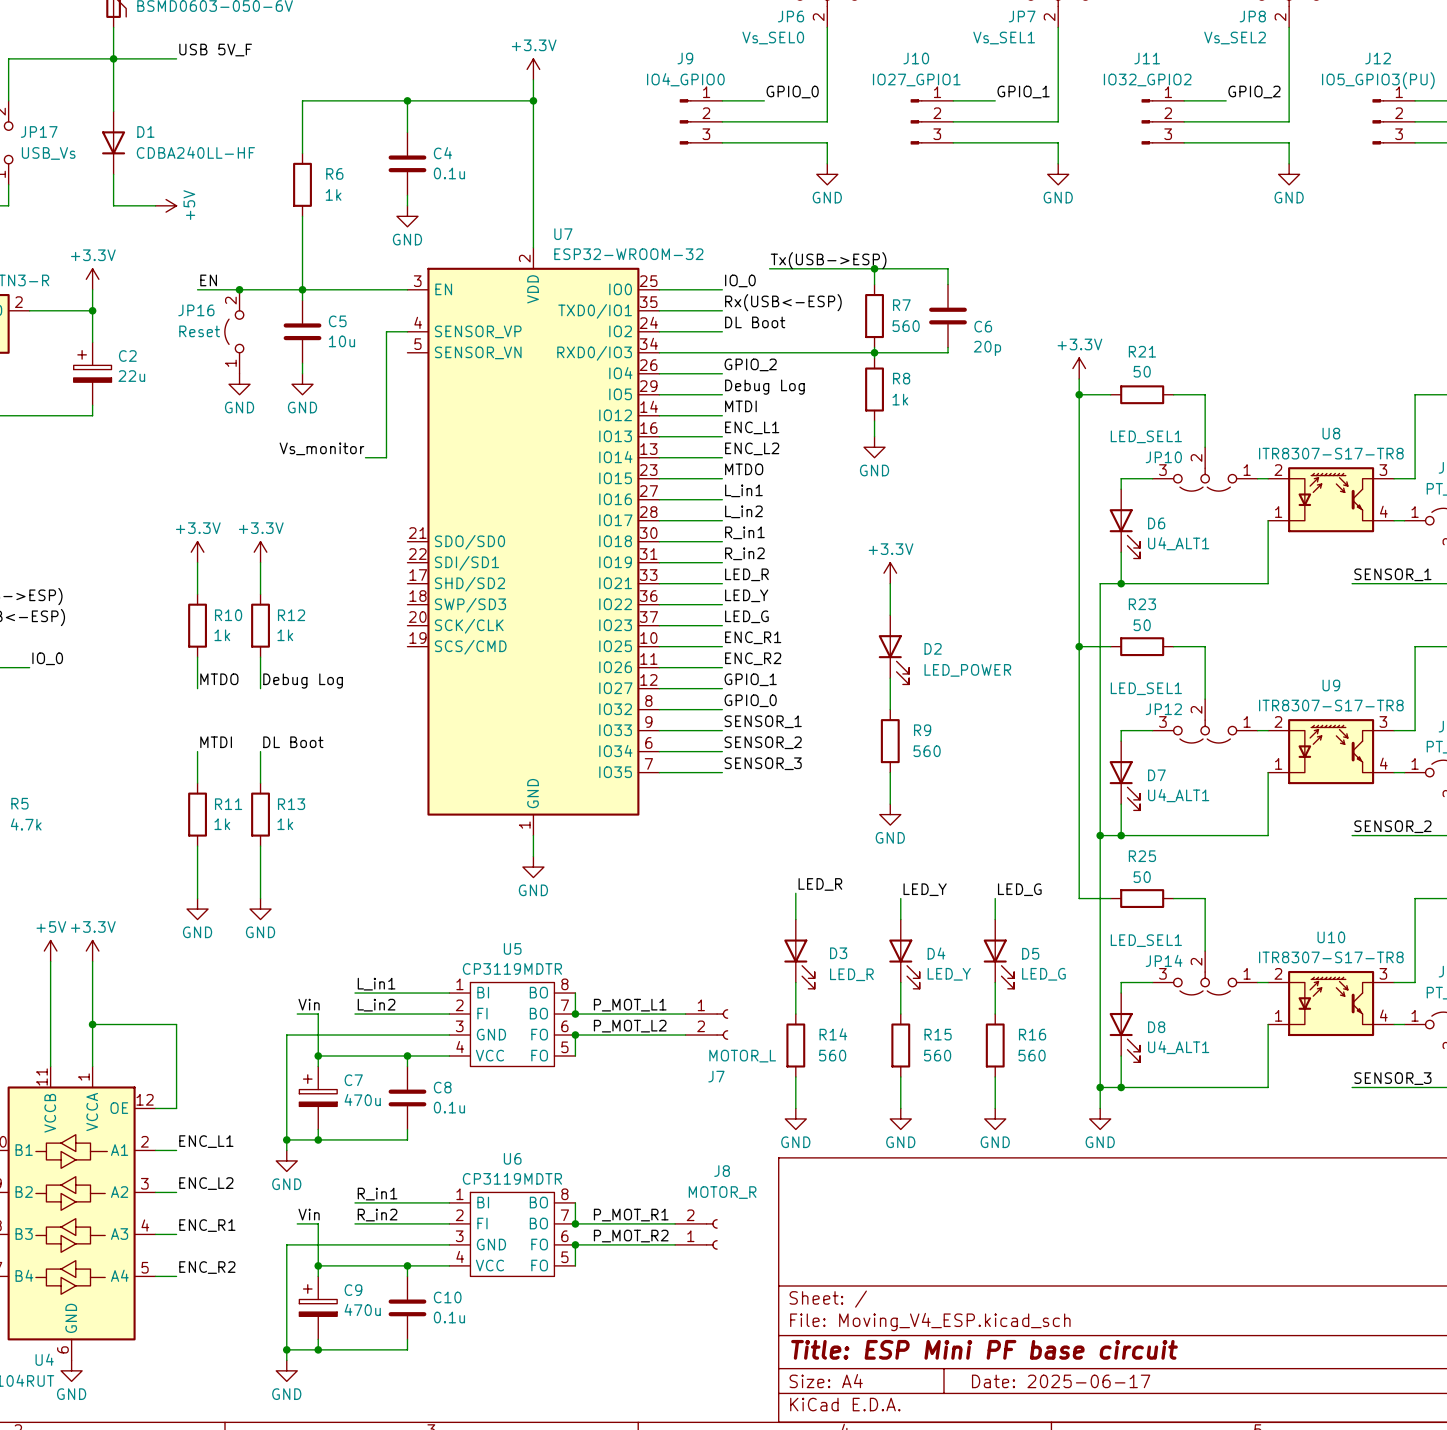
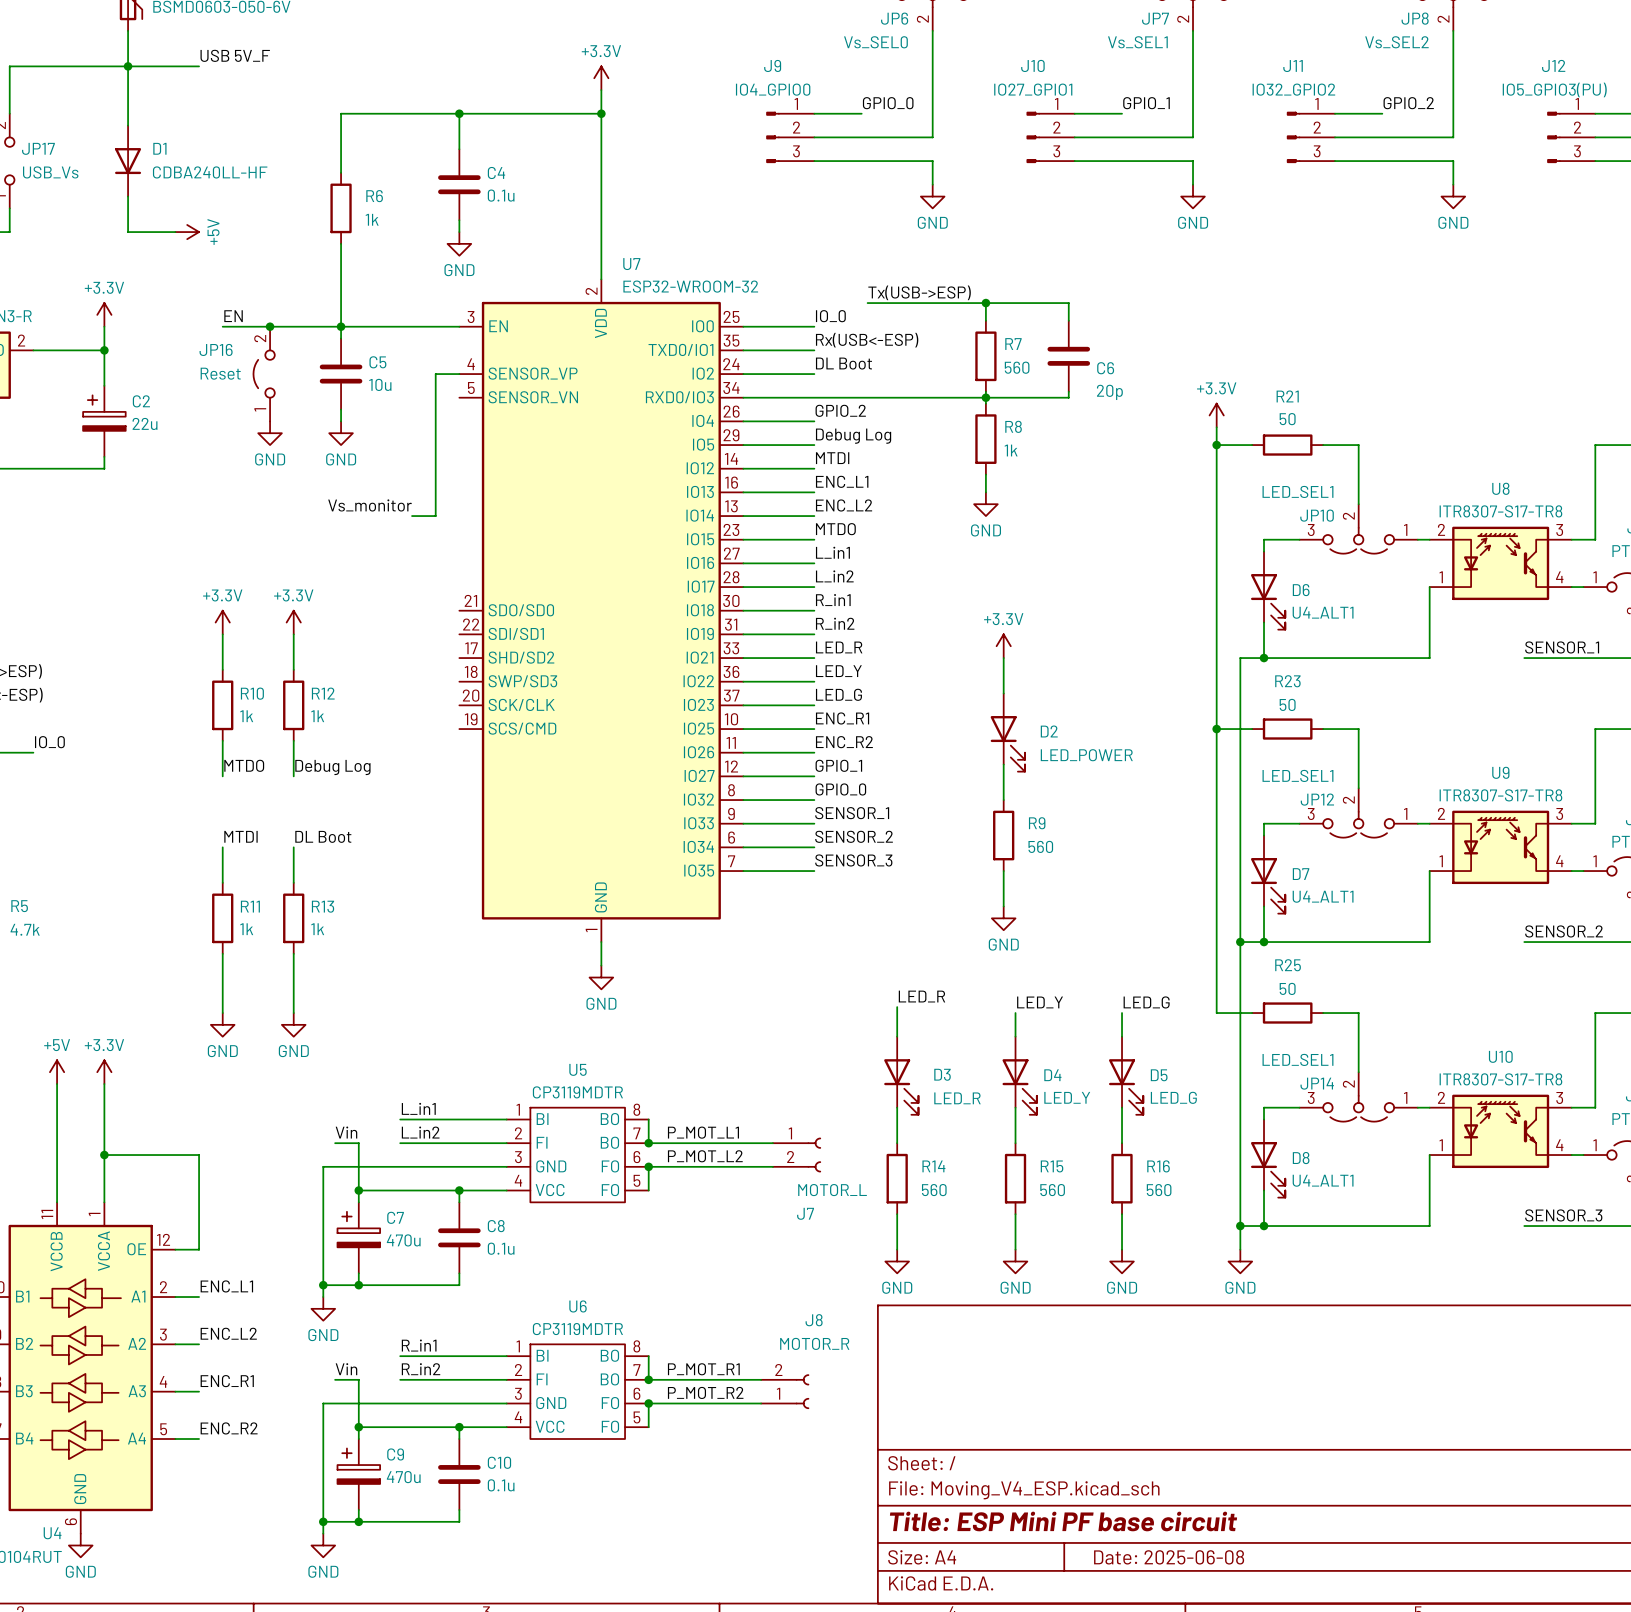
title block: Date: 2025-06-17 (1061, 1381) -> Date: 2025-06-08 (1169, 1557)

